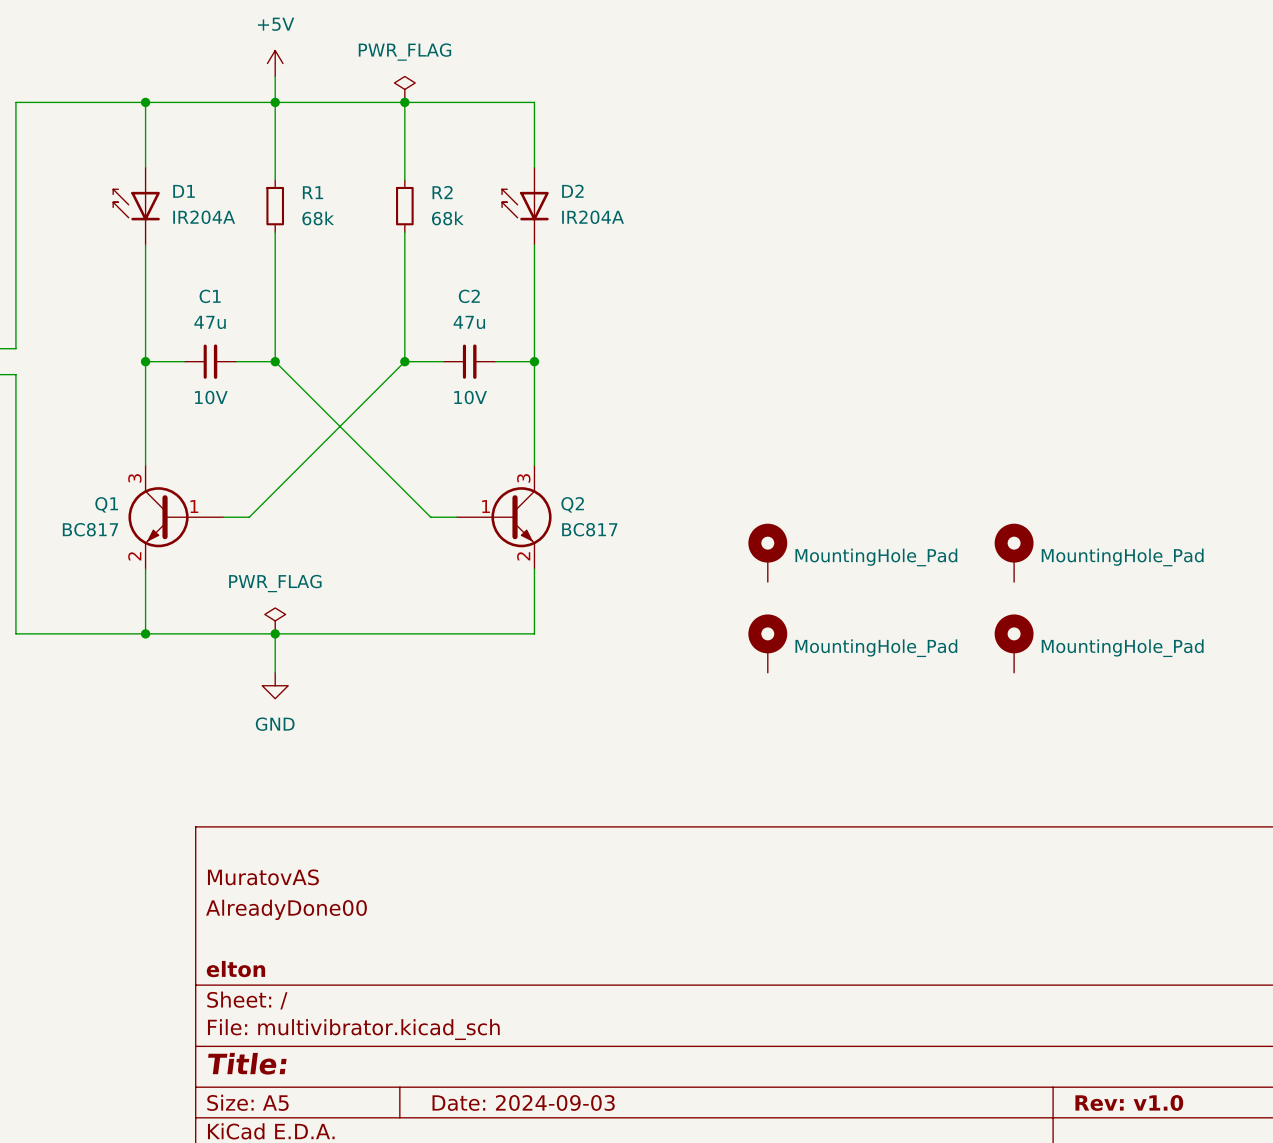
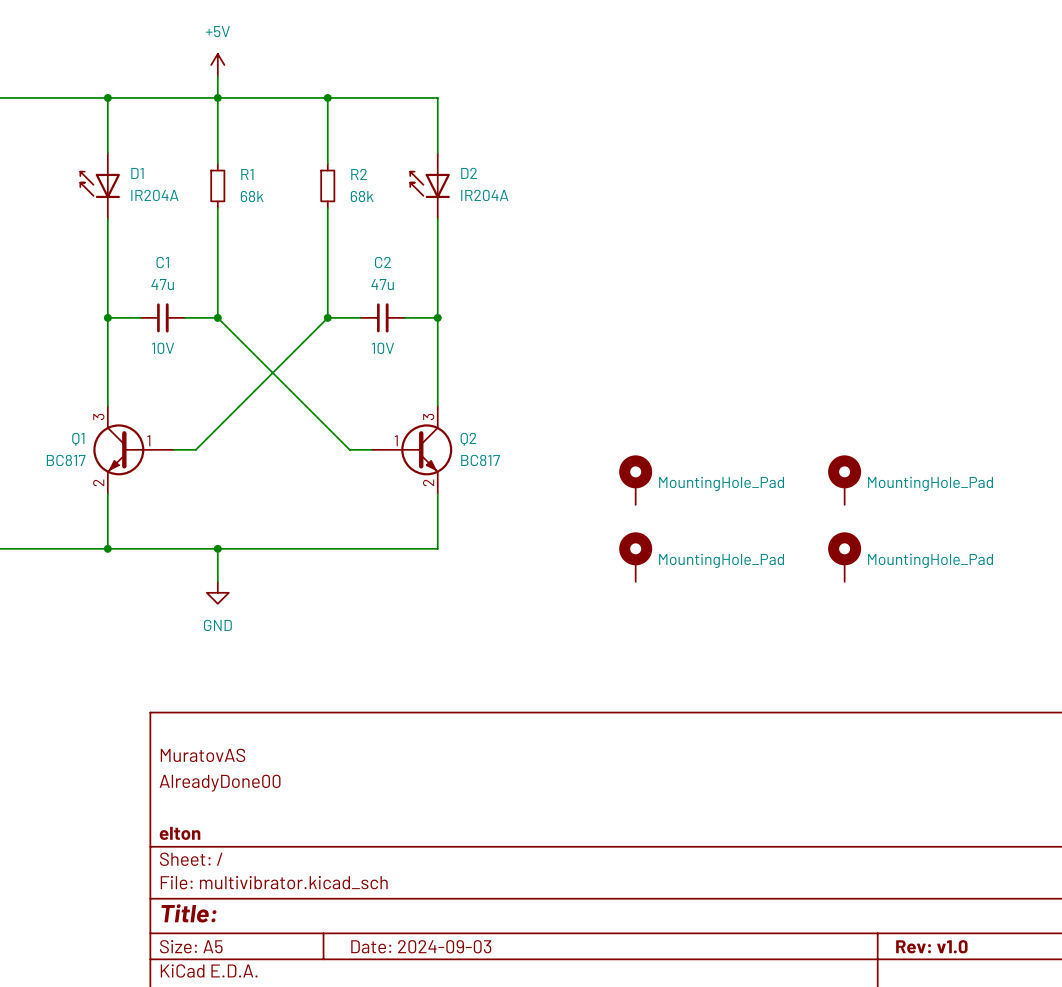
power symbol: PWR_FLAG (404, 89) -> none
power symbol: PWR_FLAG (275, 620) -> none

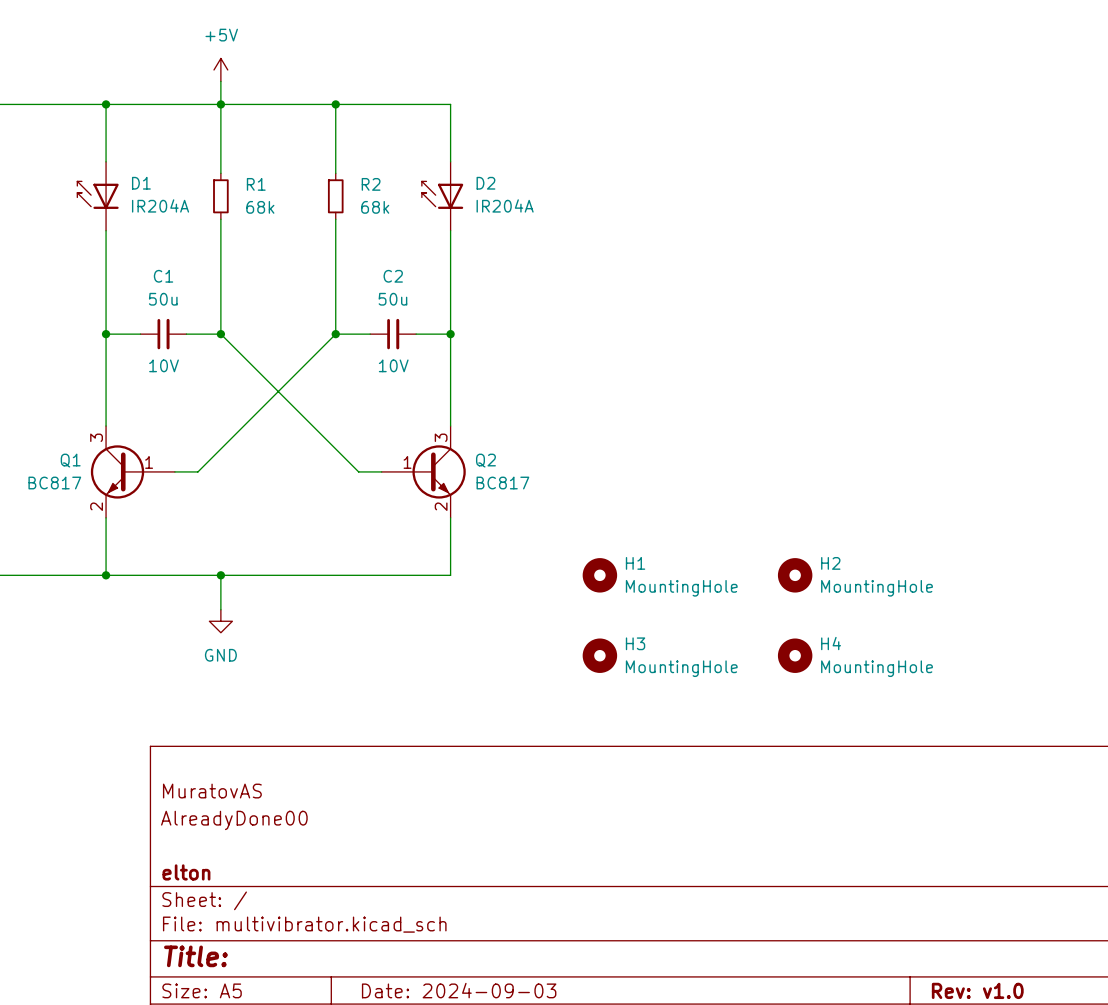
C1 value: 47u (162, 284) -> 50u (163, 299)
C2 value: 47u (382, 284) -> 50u (392, 299)
part: MountingHole_Pad (635, 480) -> none
part: MountingHole_Pad (844, 480) -> none
H1: none -> MountingHole (599, 575)
H2: none -> MountingHole (795, 575)
part: MountingHole_Pad (635, 557) -> none
part: MountingHole_Pad (844, 557) -> none
H3: none -> MountingHole (599, 655)
H4: none -> MountingHole (795, 655)

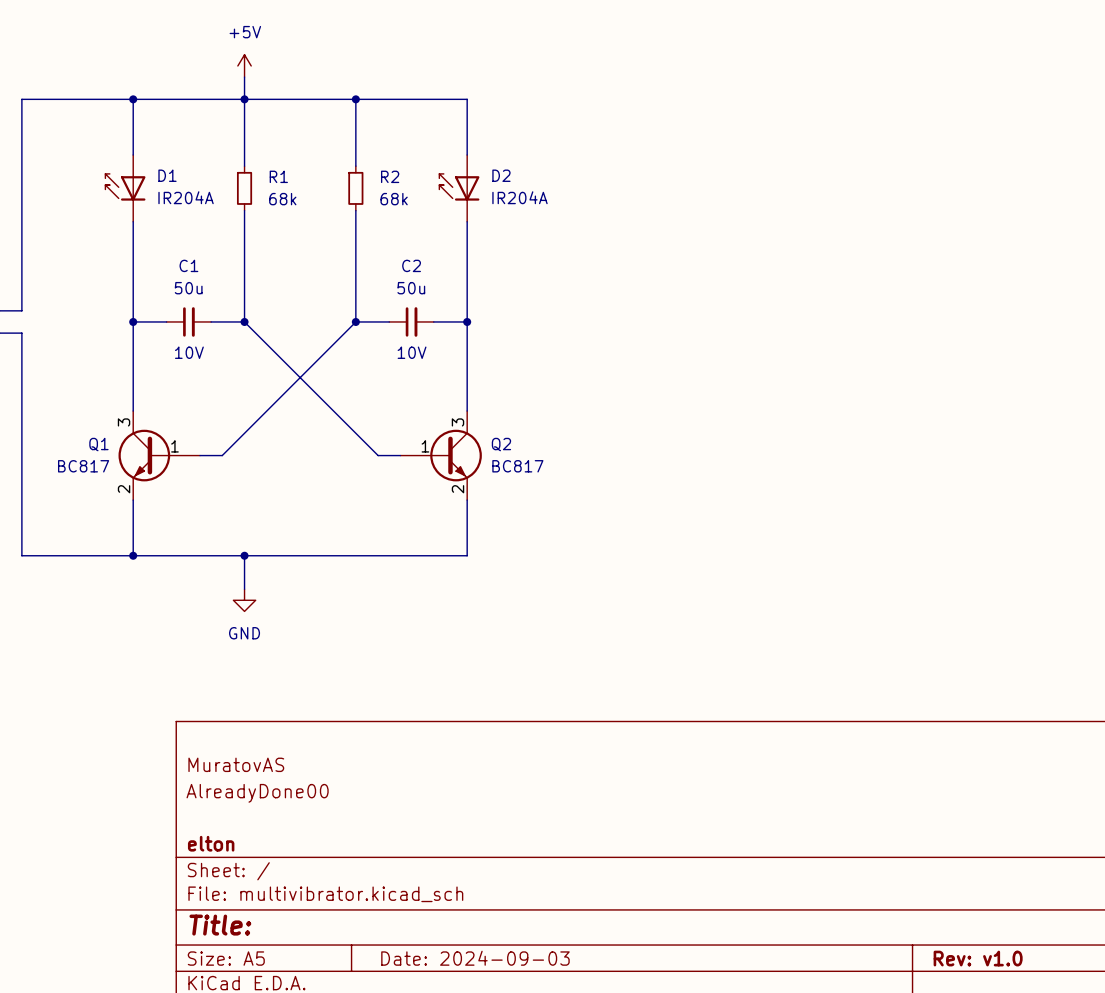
H1: MountingHole (599, 575) -> none
H2: MountingHole (795, 575) -> none
H3: MountingHole (599, 655) -> none
H4: MountingHole (795, 655) -> none

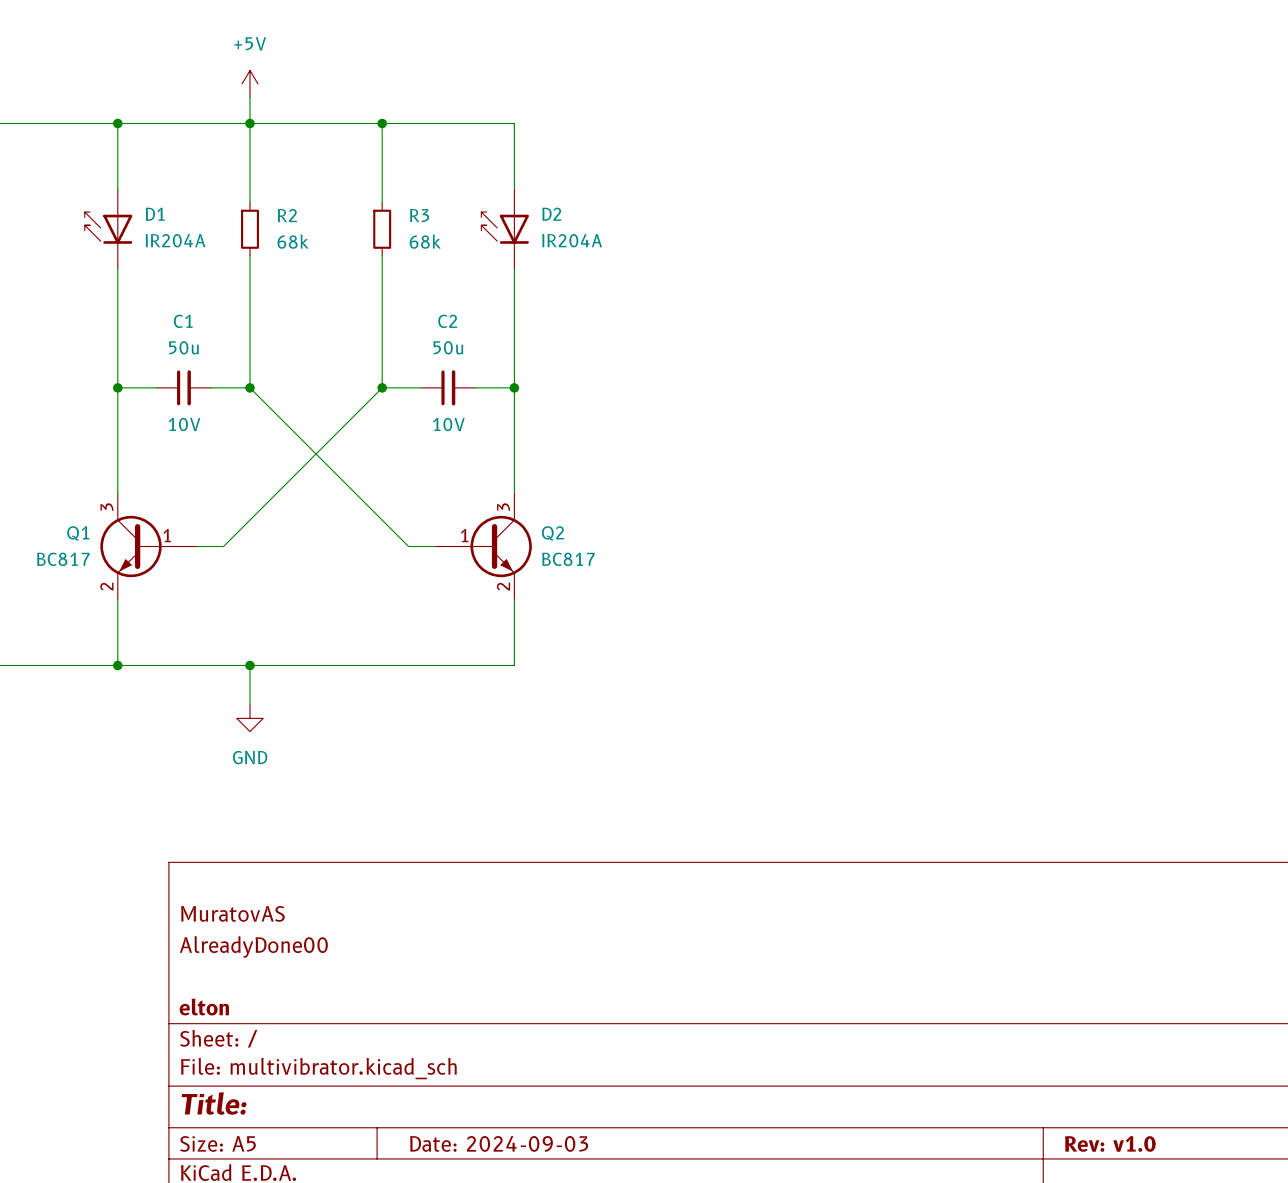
R1 name: R1 (278, 176) -> R2 (287, 215)
R2 name: R2 (390, 176) -> R3 (419, 215)

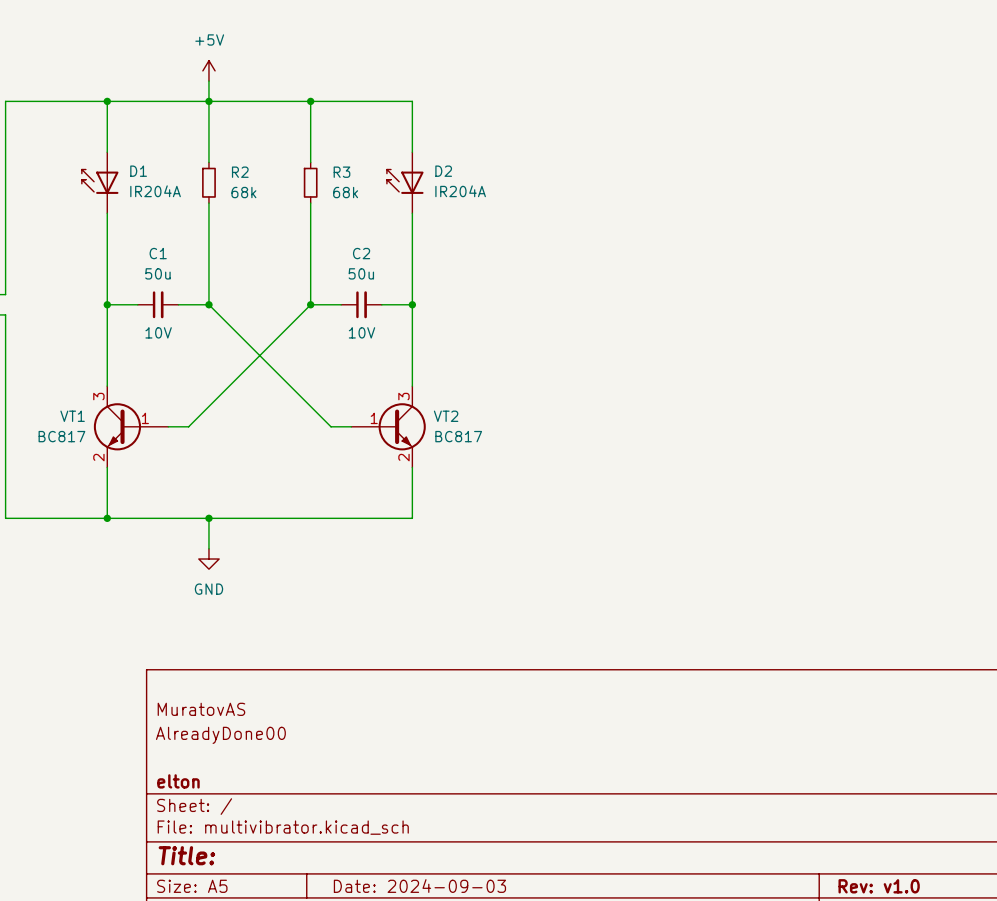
Q1 name: Q1 (78, 533) -> VT1 (72, 416)
Q2 name: Q2 (552, 533) -> VT2 (446, 416)

